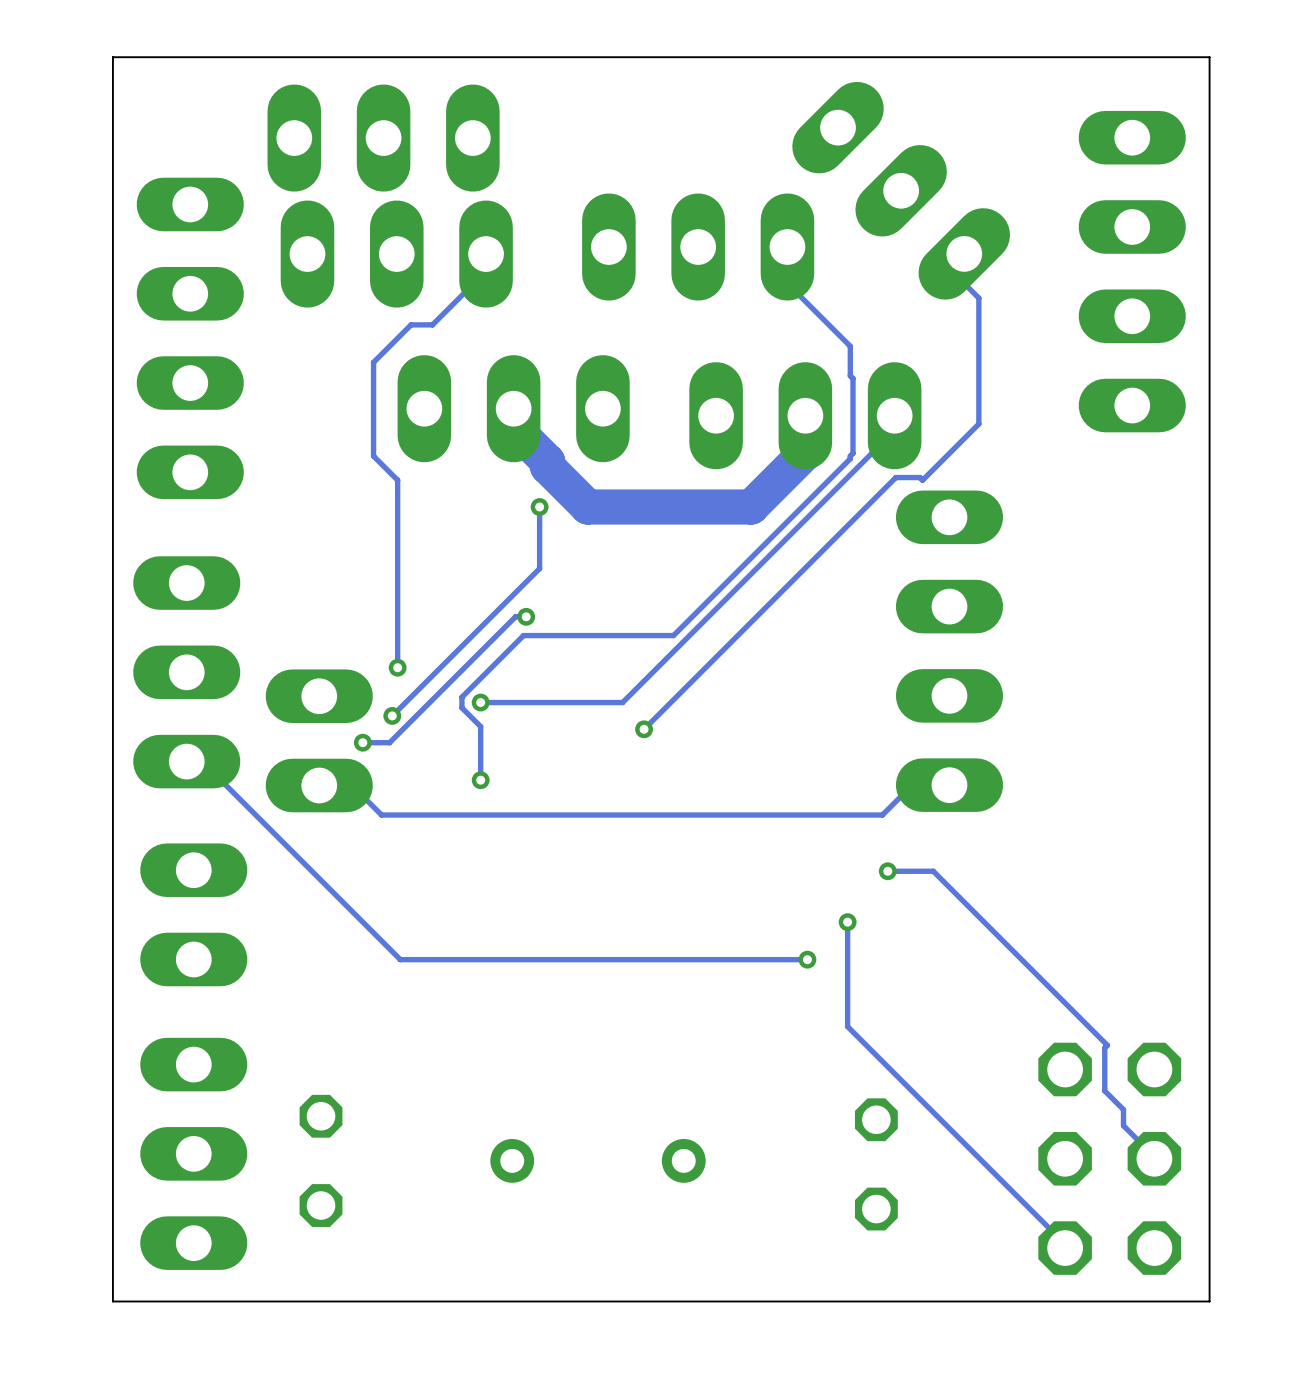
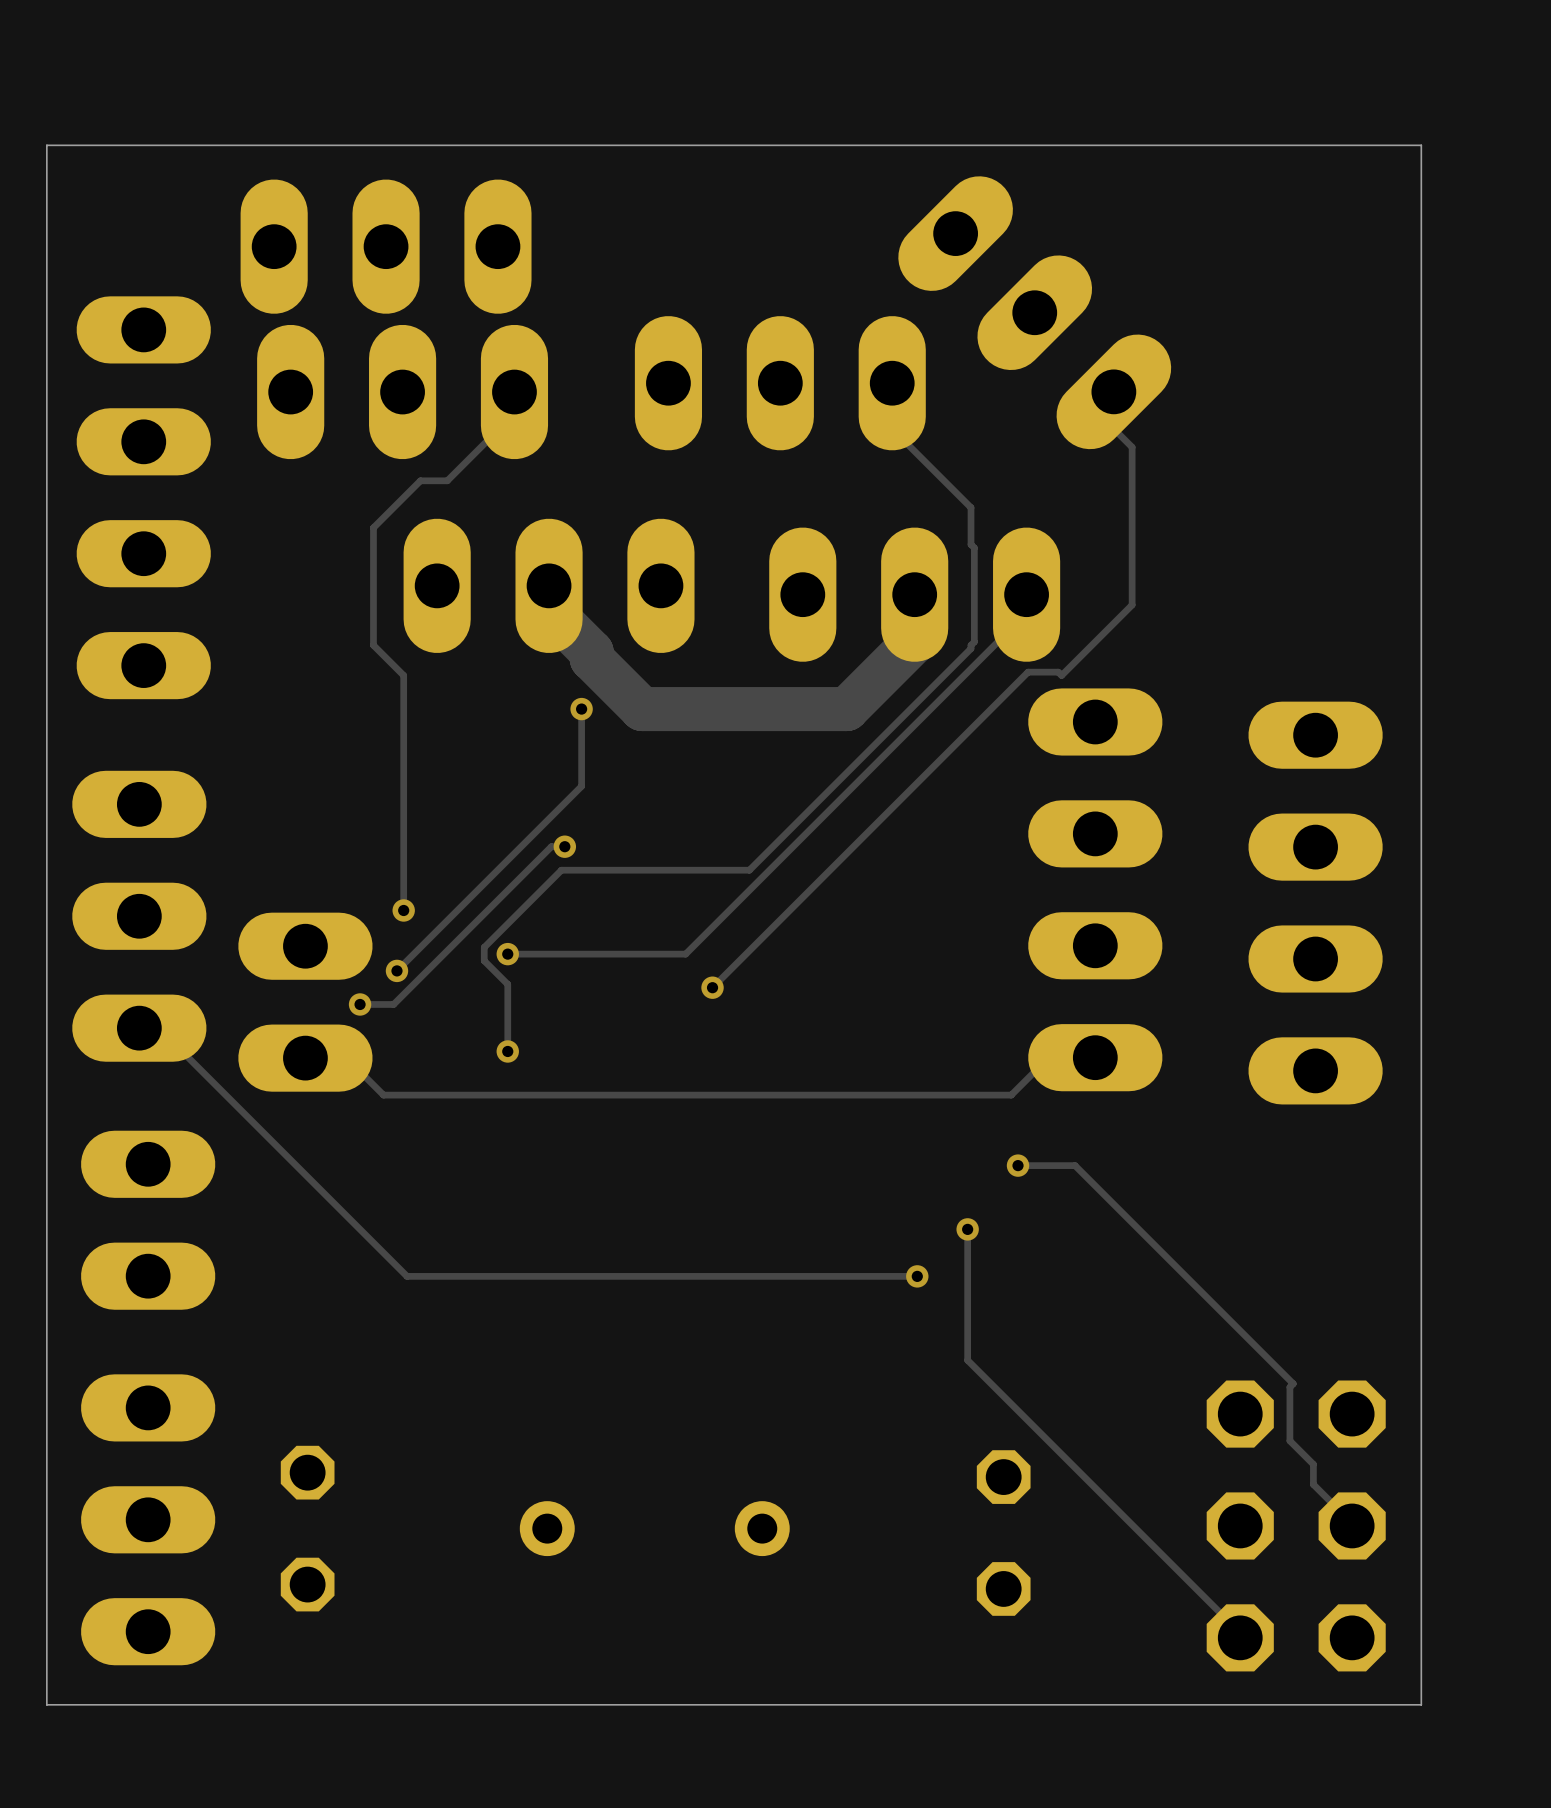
part position: (1132, 271) -> (1315, 903)

